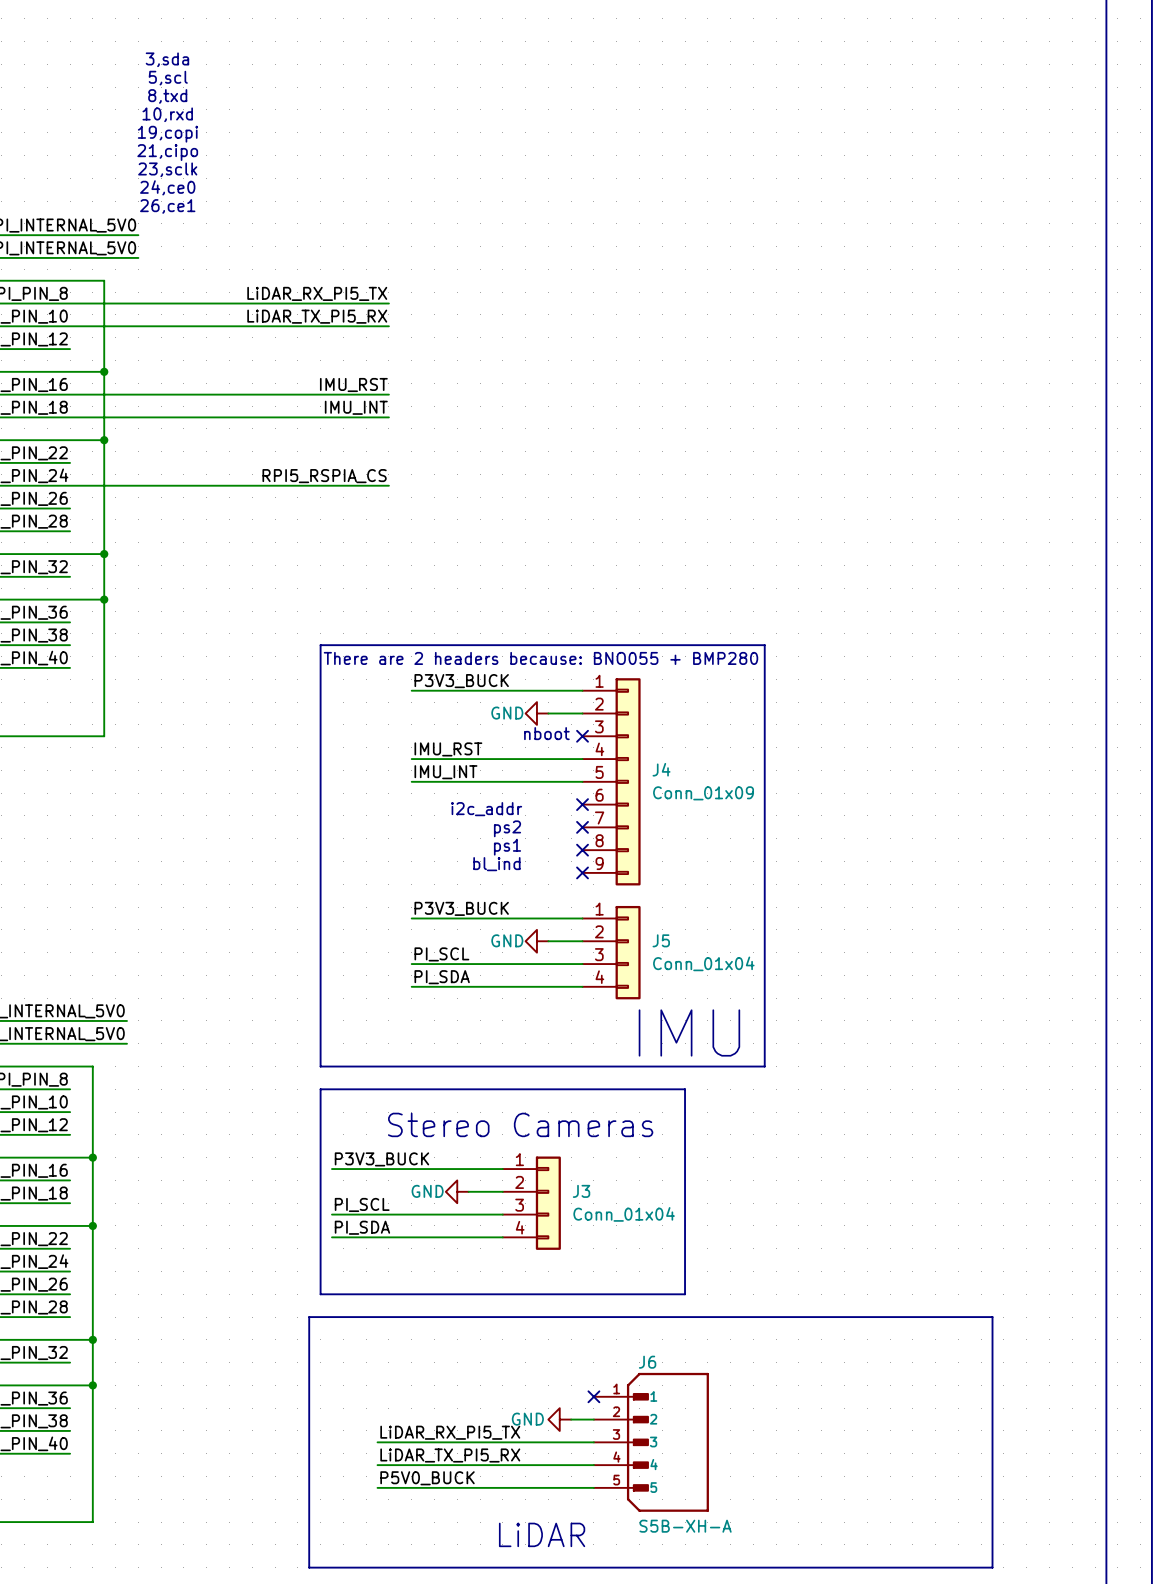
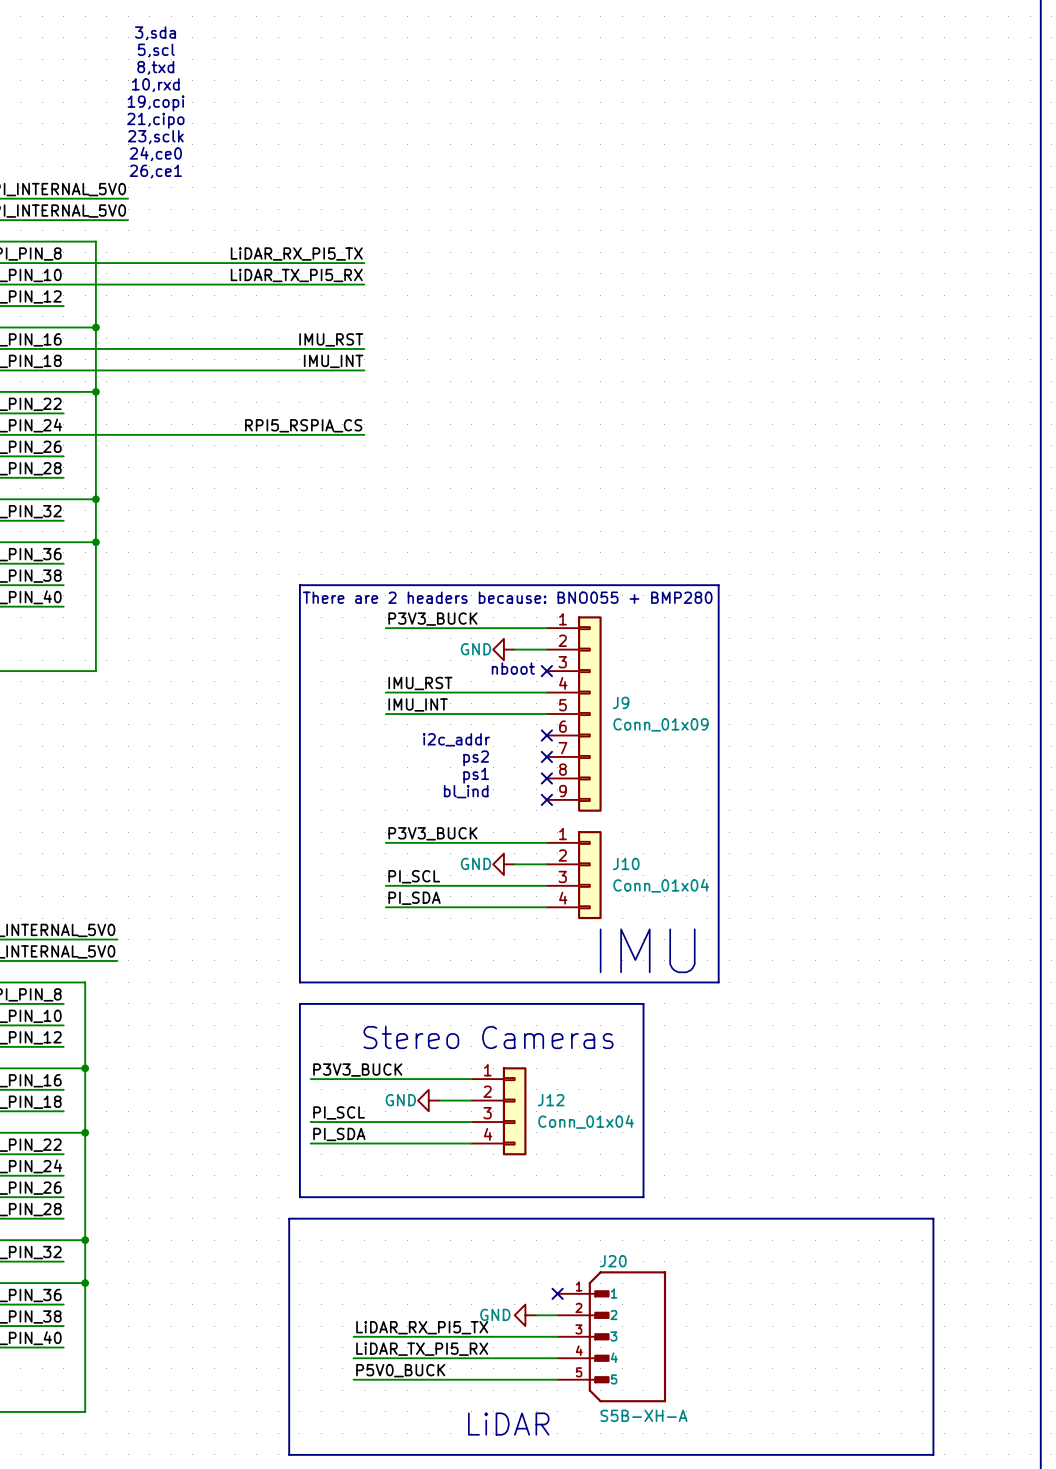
J4 name: J4 (661, 769) -> J9 (621, 702)
J5 name: J5 (661, 940) -> J10 (626, 863)
J3 name: J3 (581, 1191) -> J12 (551, 1100)
J6 name: J6 (647, 1362) -> J20 (613, 1261)

